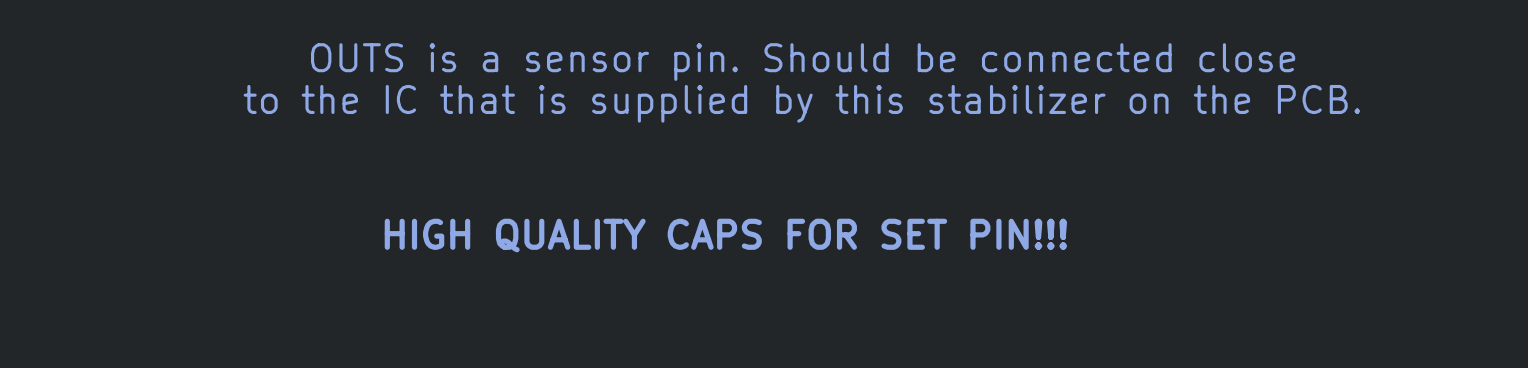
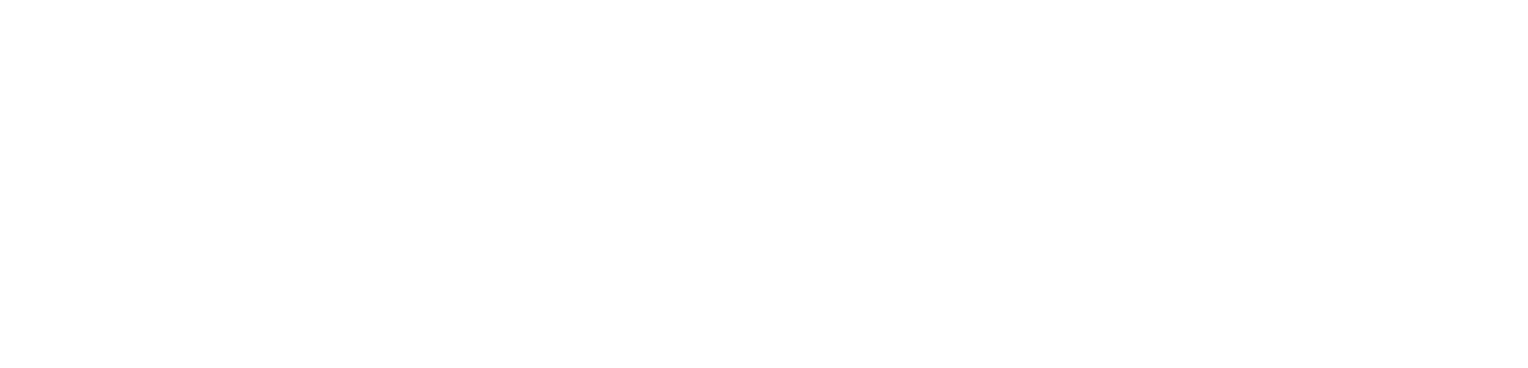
text: OUTS is a sensor pin. Should be connected close (803, 62) -> none
text: to the IC that is supplied by this stabilizer on the PCB. (801, 103) -> none
text: HIGH QUALITY CAPS FOR SET PIN!!! (725, 235) -> none

